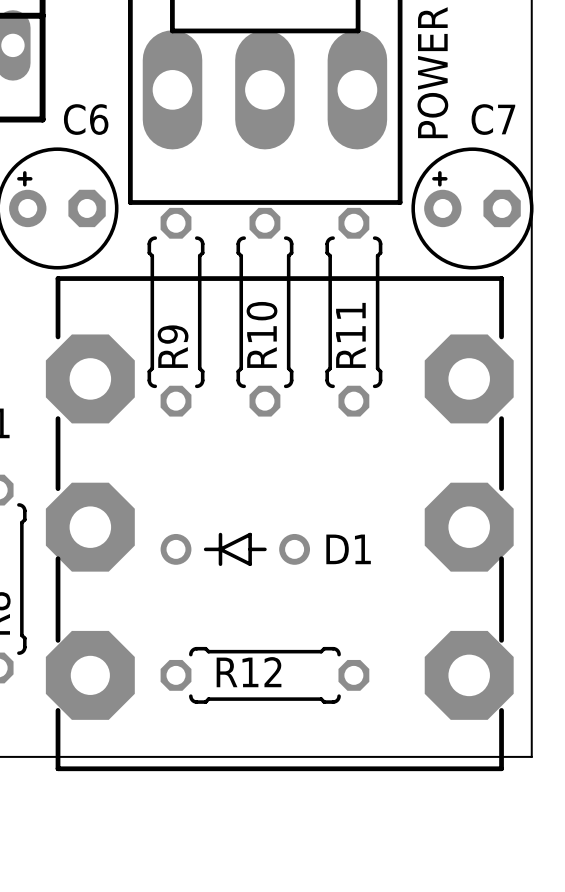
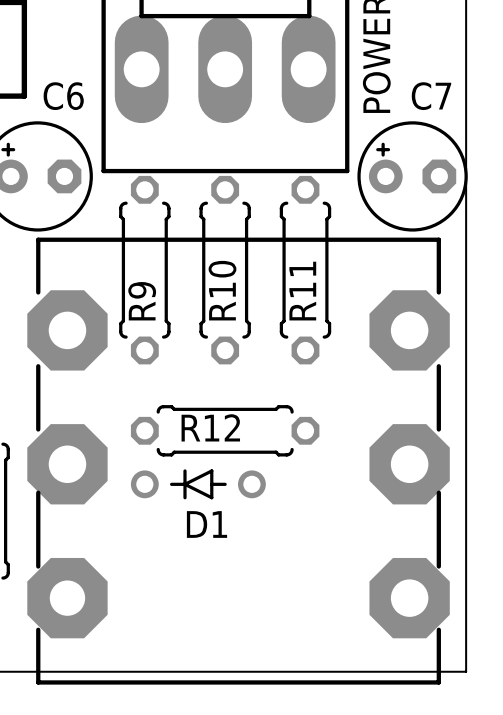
D1 name position: D1 (348, 549) -> D1 (206, 524)
R12 position: (264, 675) -> (225, 430)

